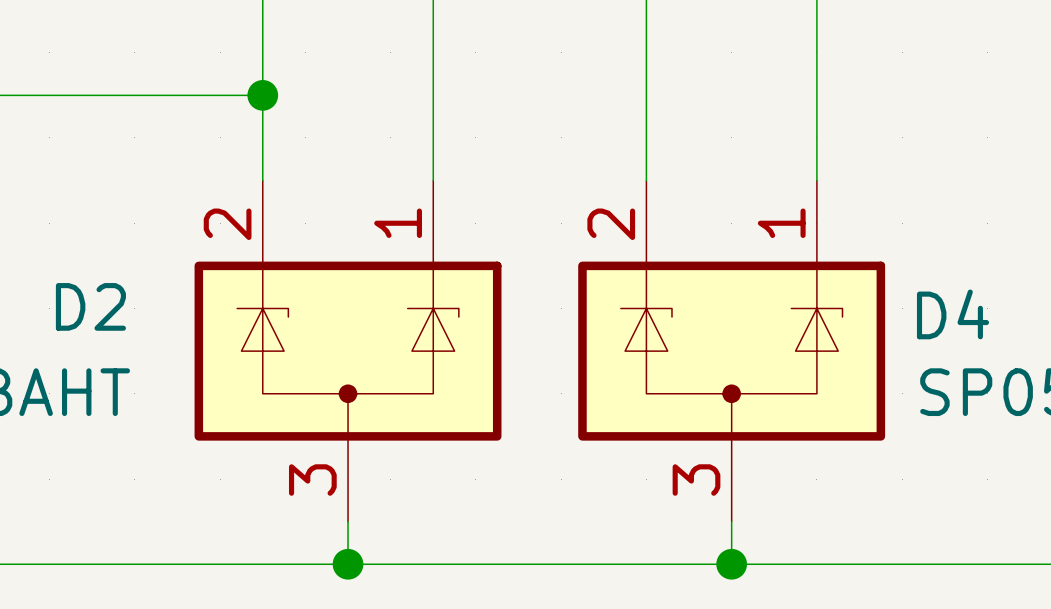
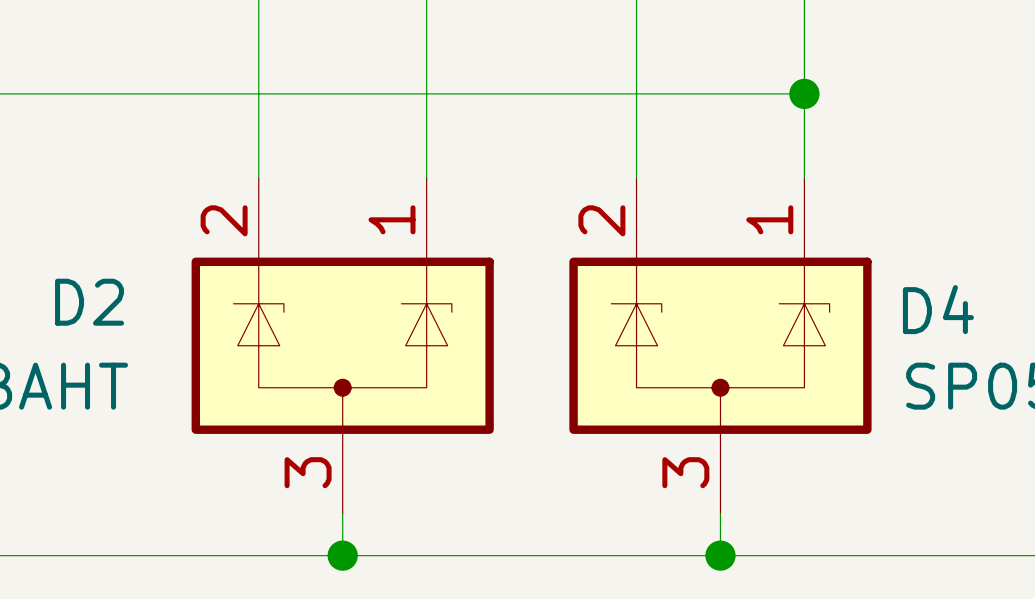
wire: none -> (258, 93) (804, 93)
junction: (262, 95) -> none
junction: none -> (804, 93)

